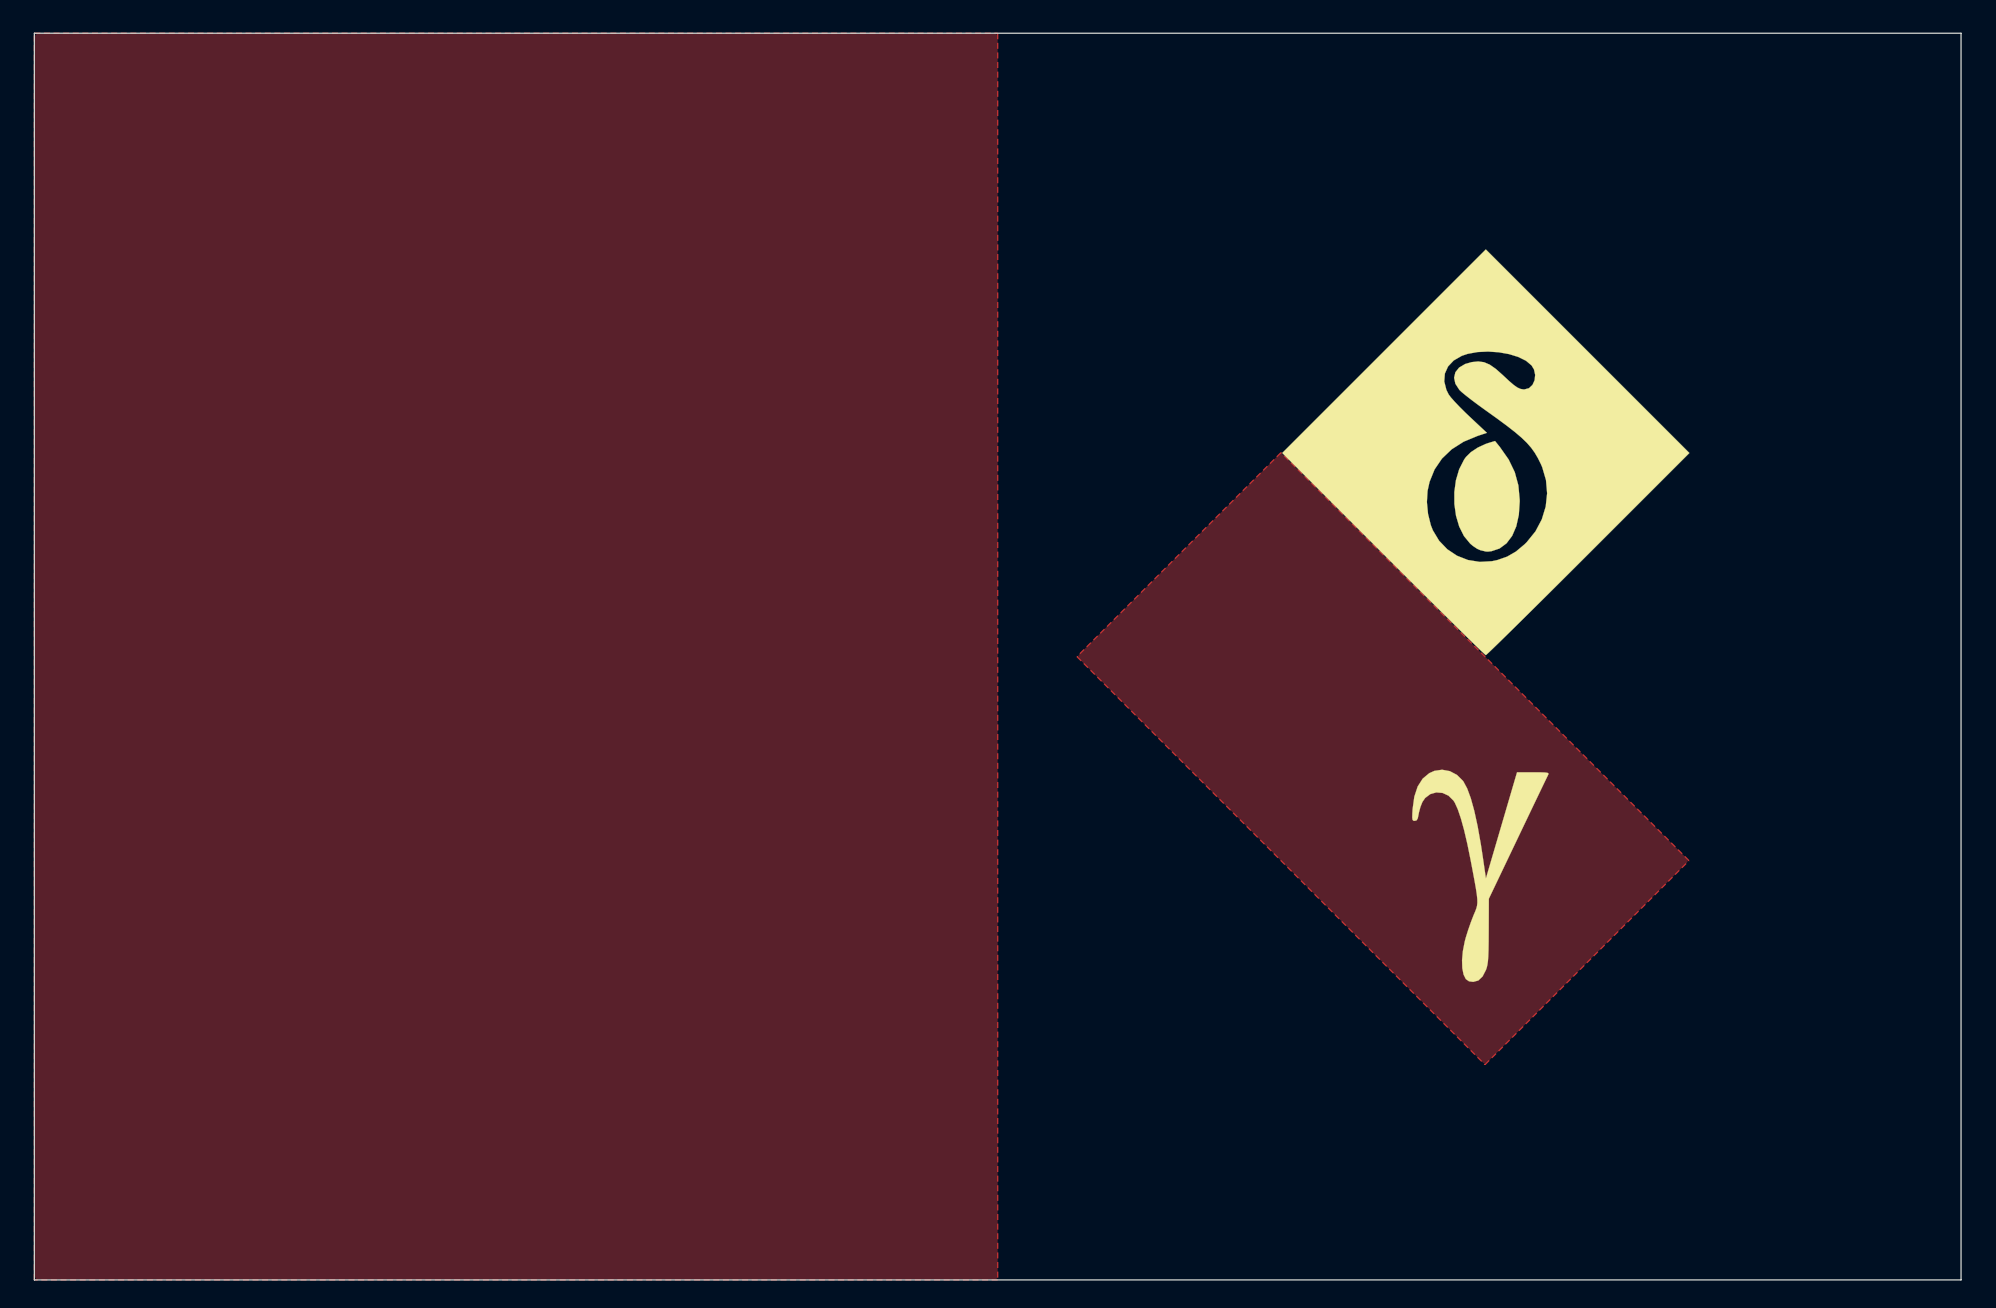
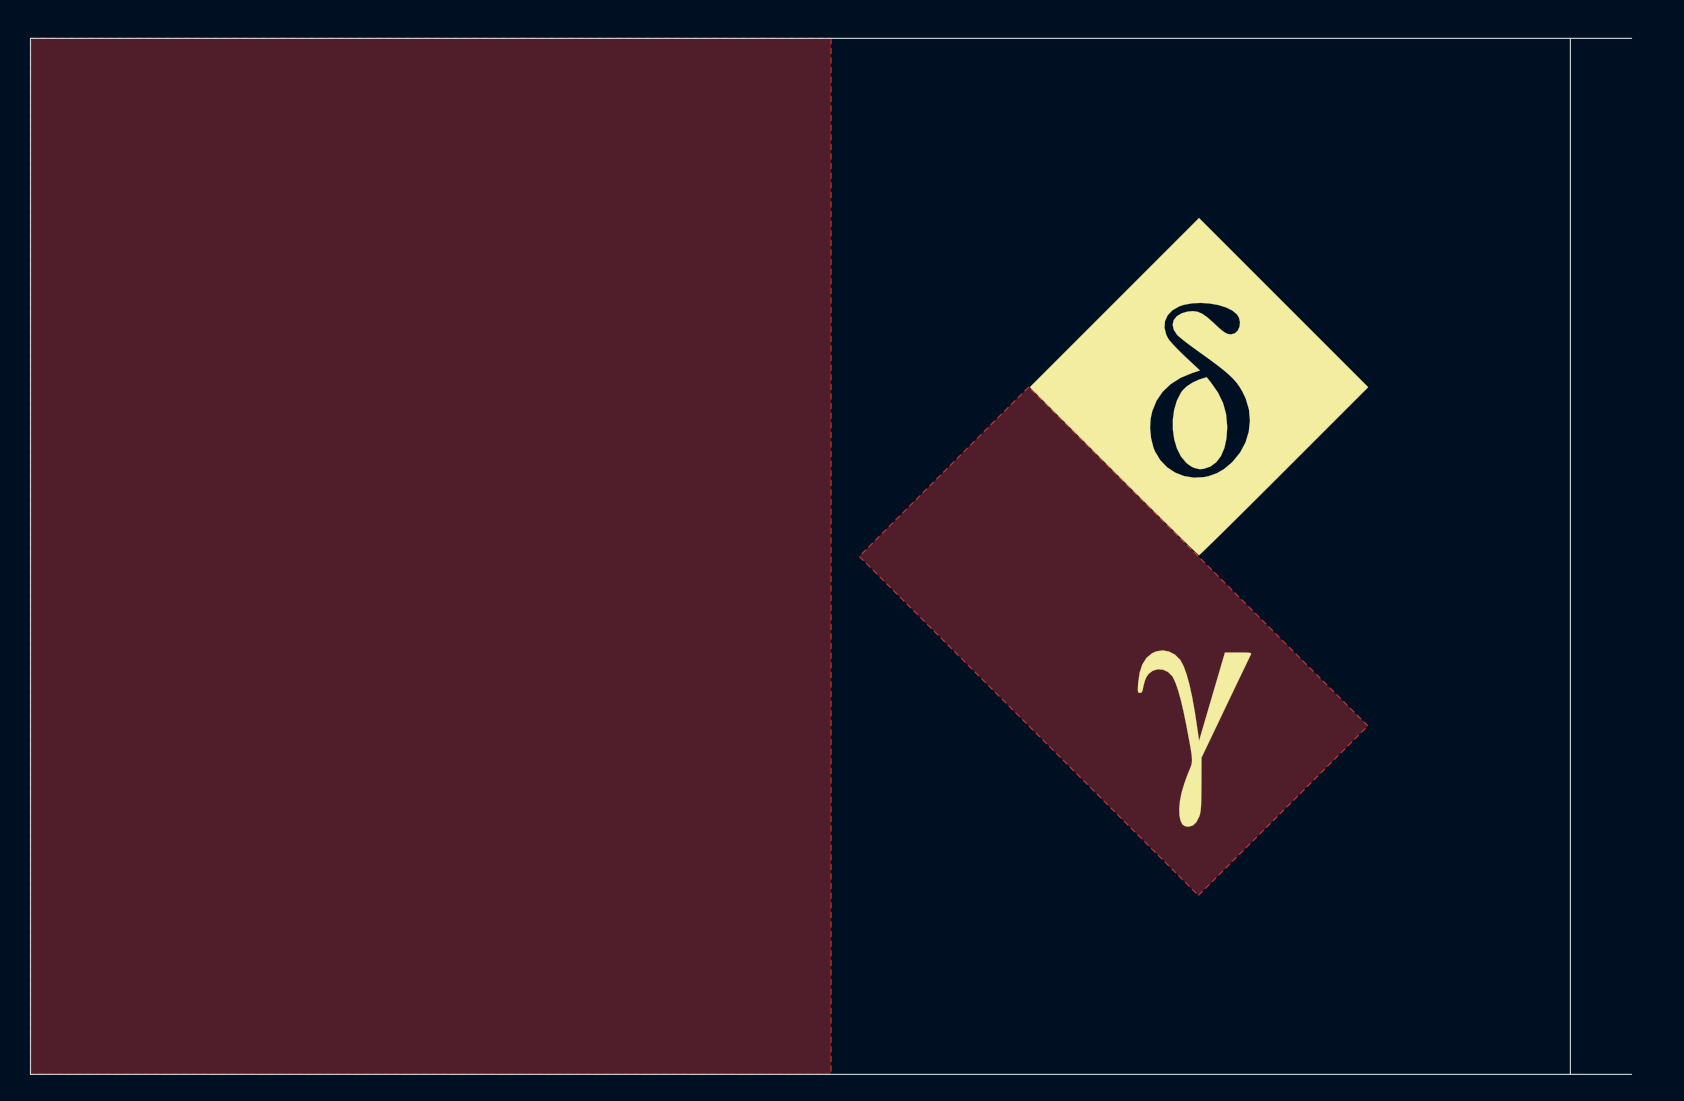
board edge: (1961, 33) (1961, 1279) -> (1570, 38) (1570, 1074)
zone outline: (1280, 452) (1688, 860) (1484, 1064) (1076, 656) (1280, 452) -> (1028, 386) (1367, 725) (1198, 895) (859, 556) (1028, 386)
drawing position: (1485, 615) -> (1199, 522)

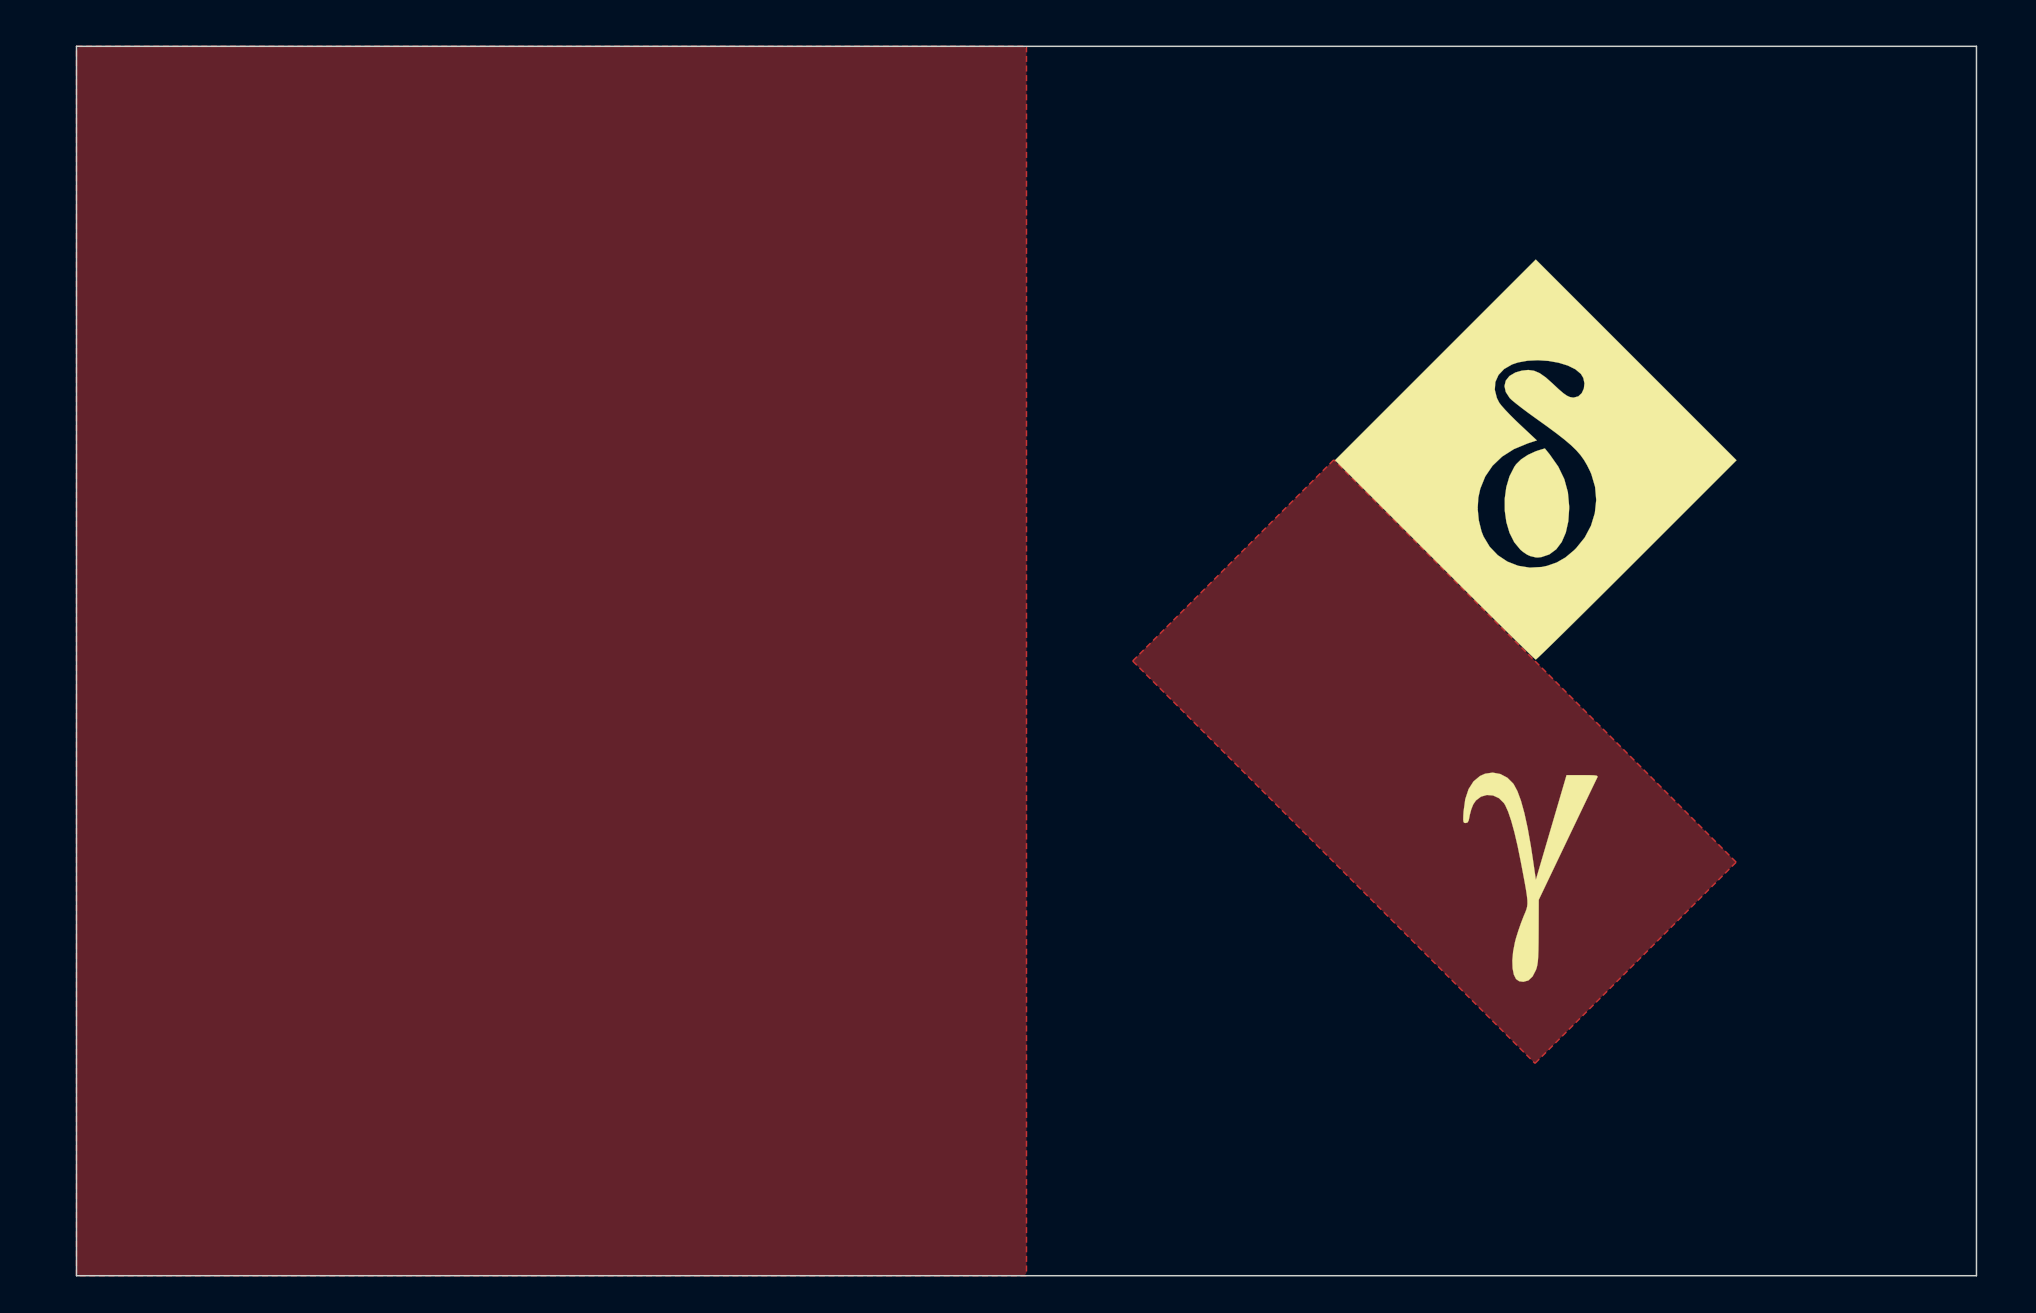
board edge: (1570, 38) (1570, 1074) -> (1976, 46) (1976, 1275)
zone outline: (1028, 386) (1367, 725) (1198, 895) (859, 556) (1028, 386) -> (1333, 459) (1736, 862) (1535, 1063) (1132, 661) (1333, 459)
drawing position: (1199, 522) -> (1535, 620)

